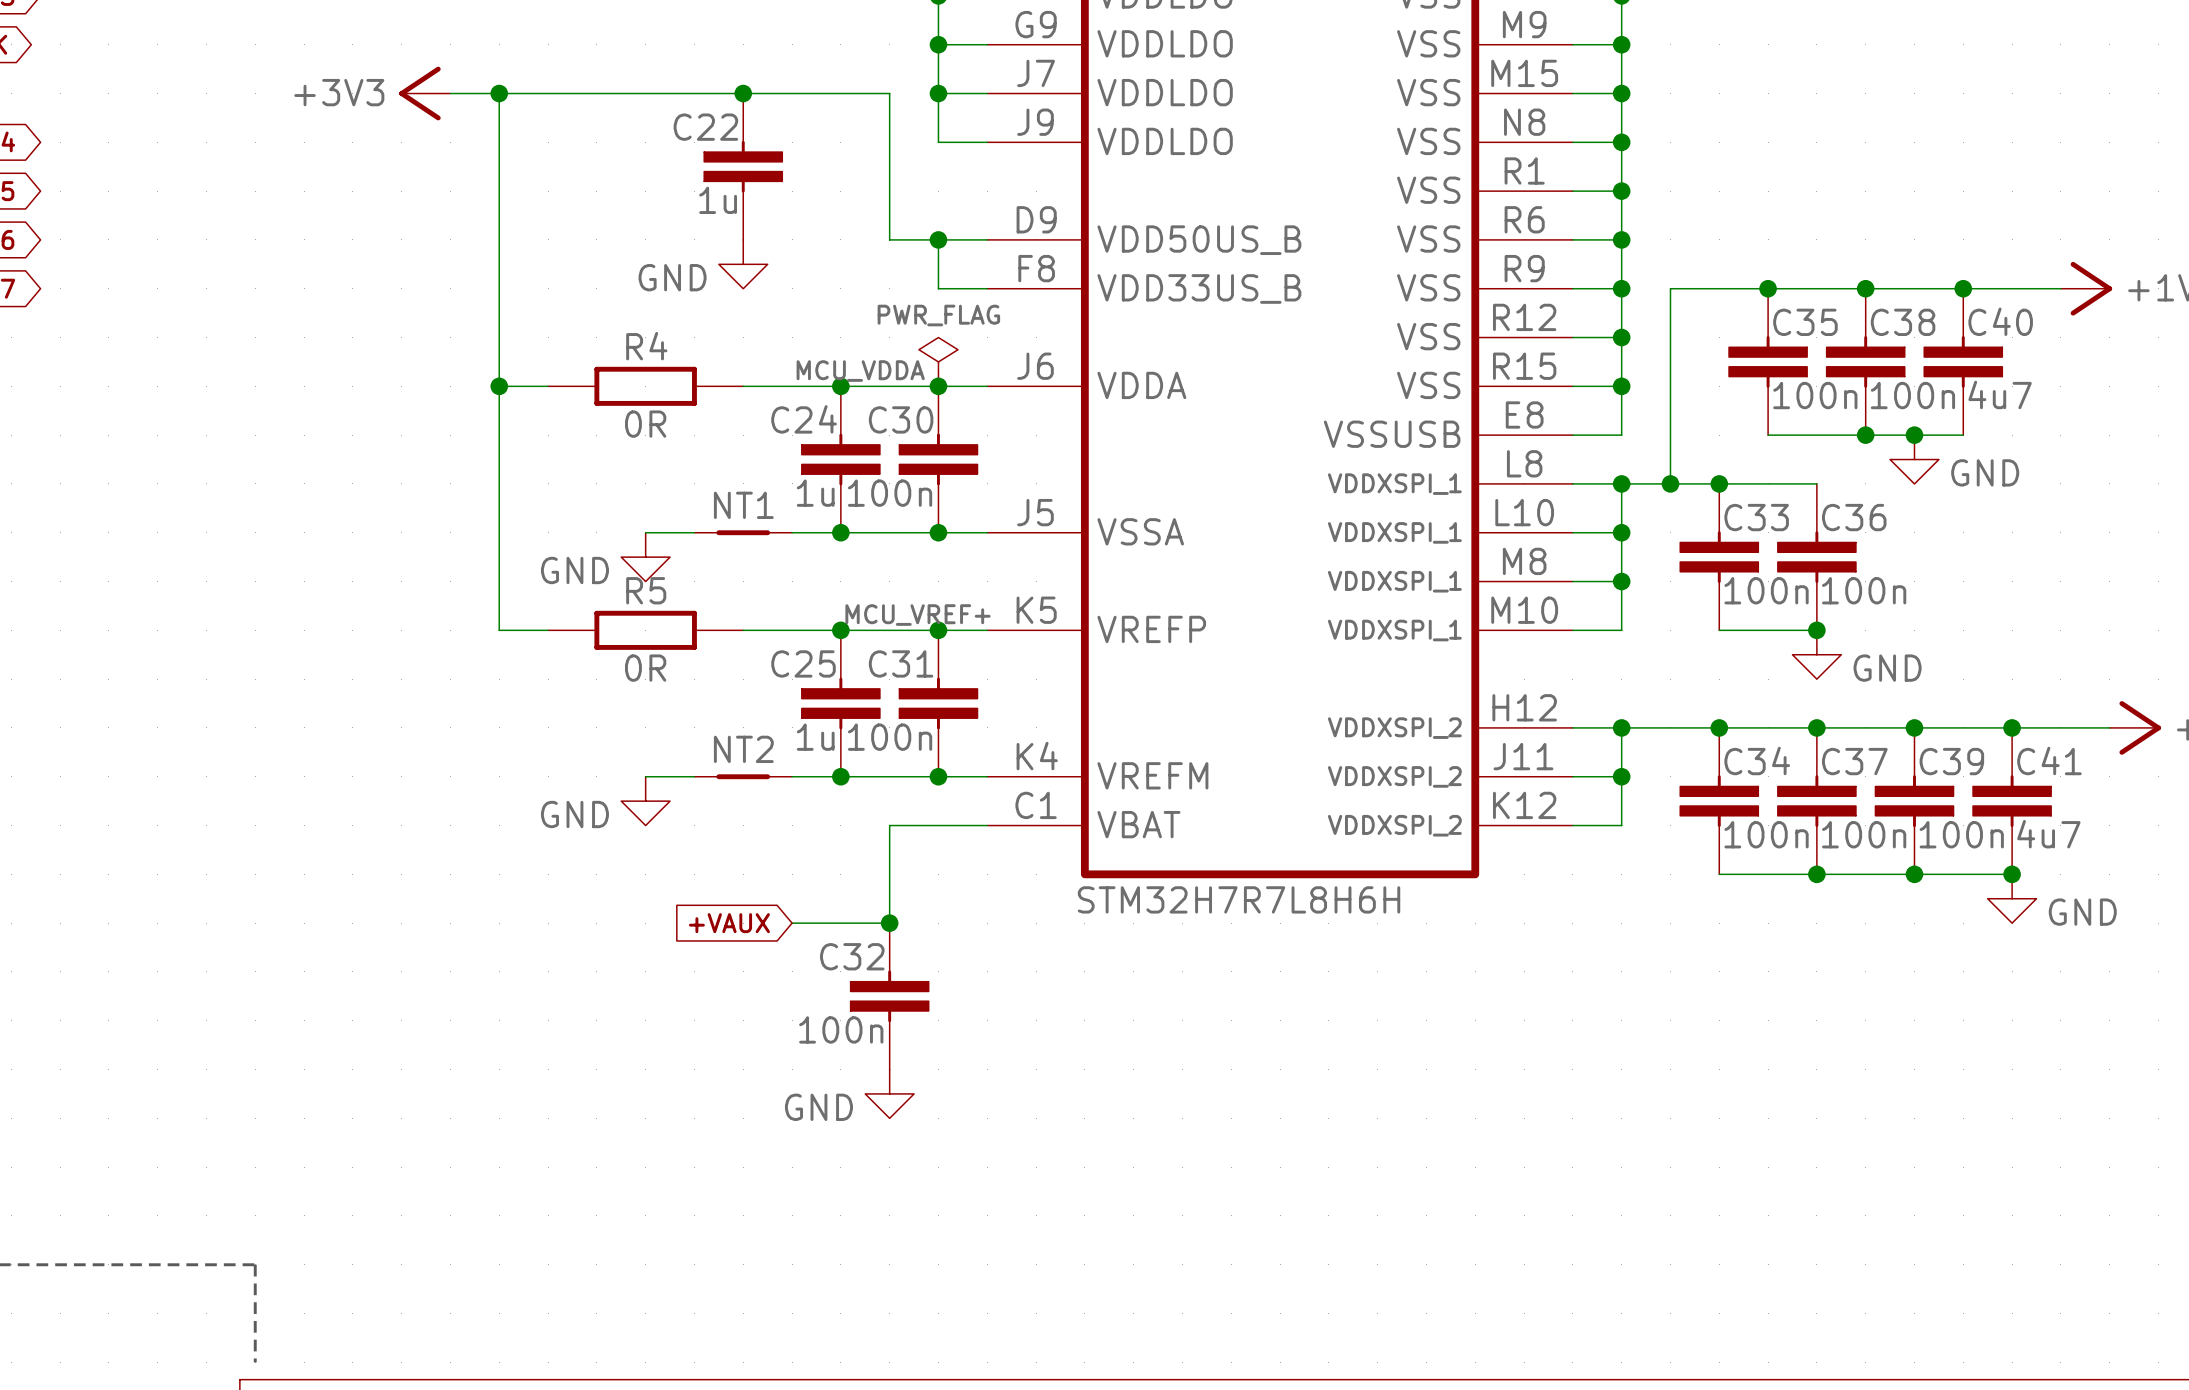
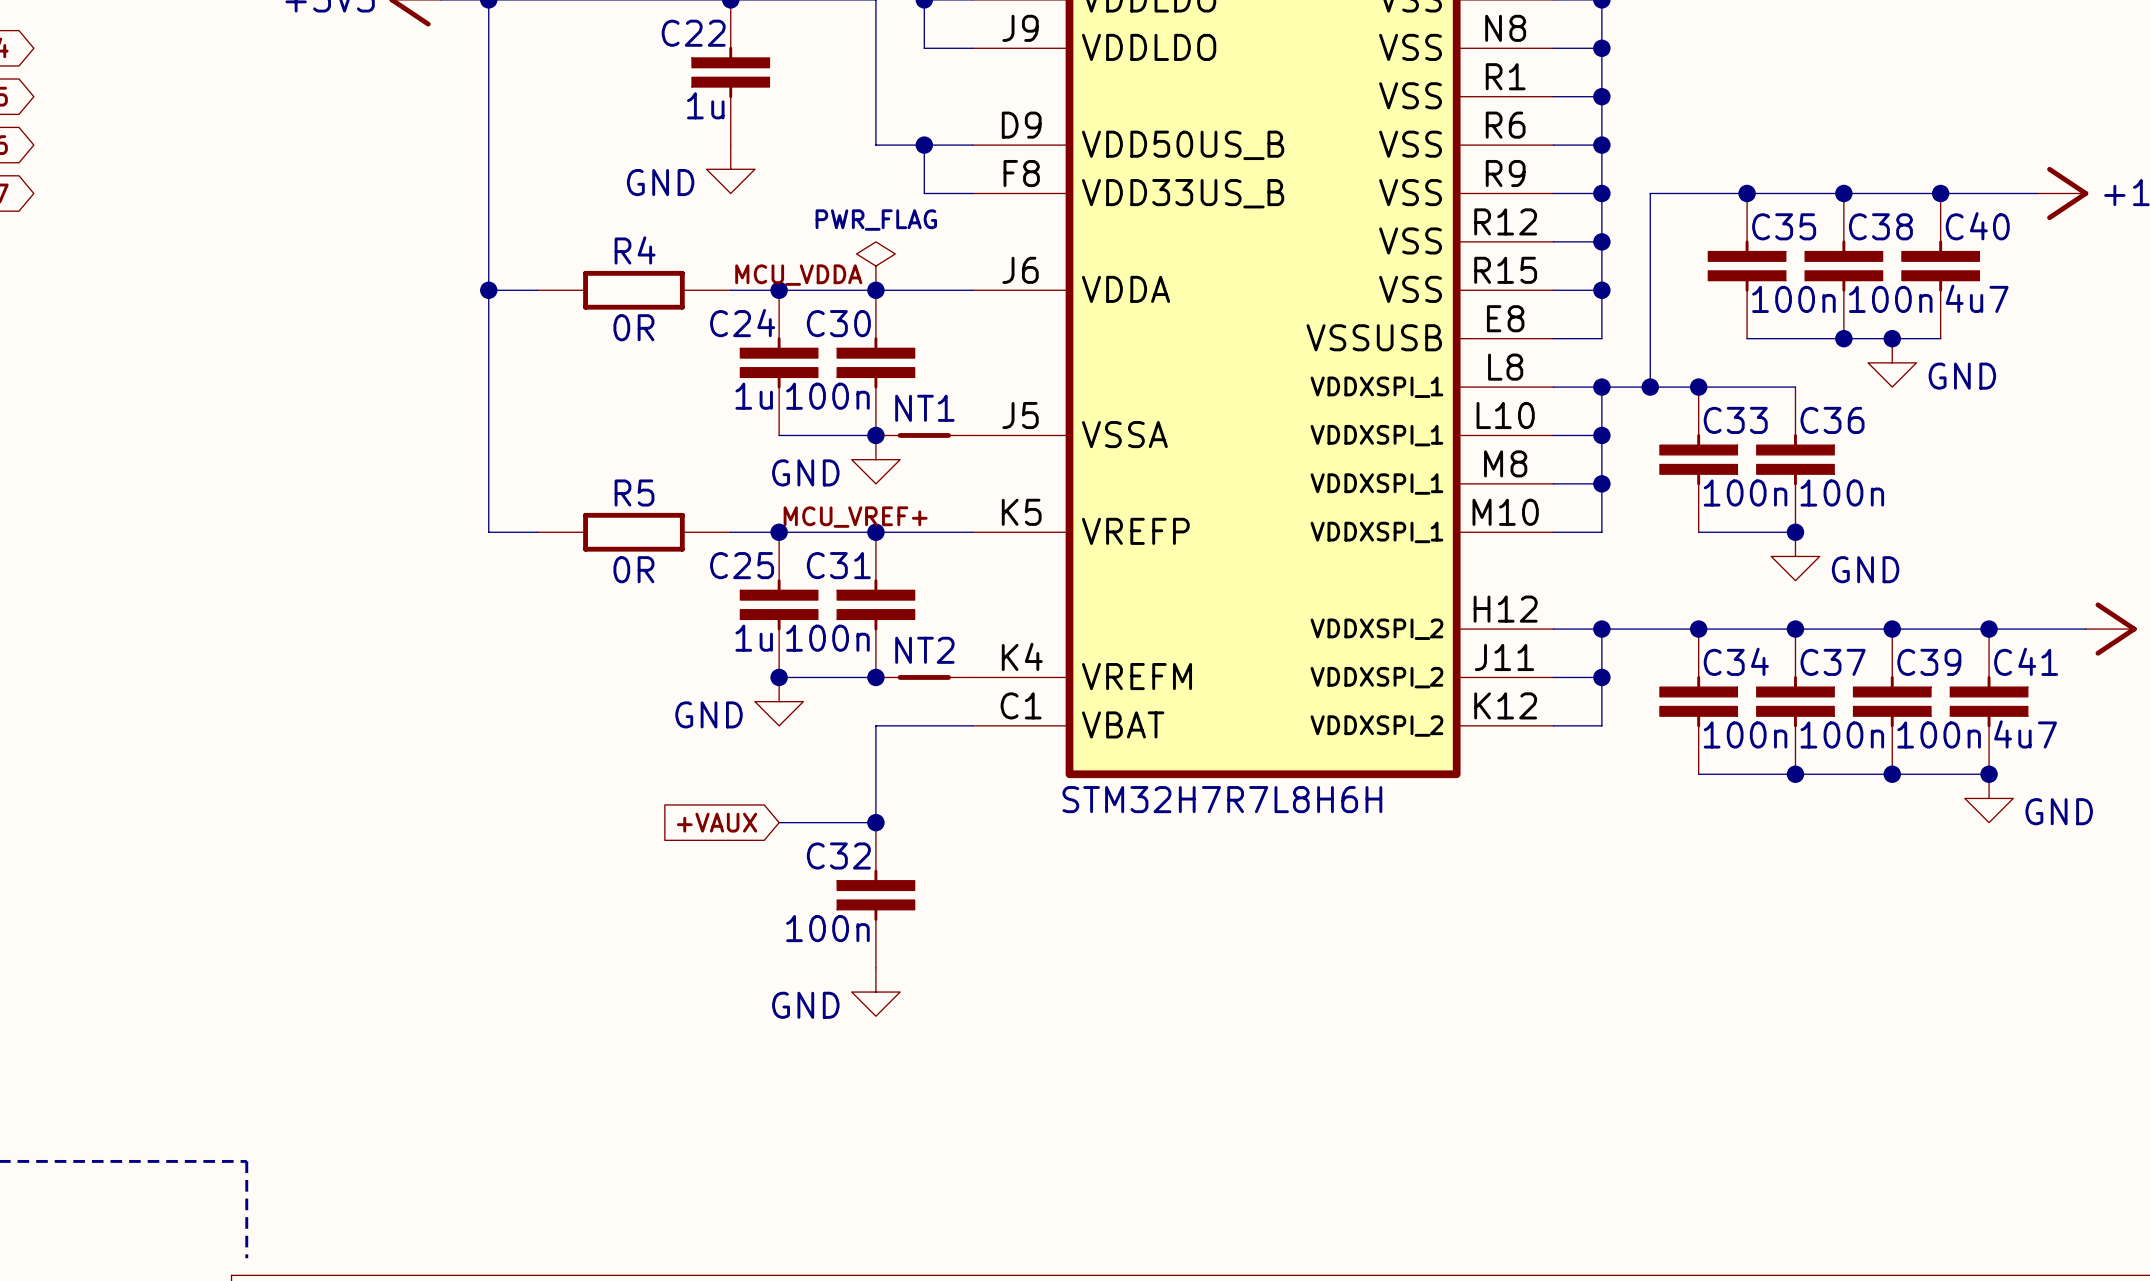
power symbol position: PWR_FLAG (938, 361) -> PWR_FLAG (875, 266)
label position: MCU_VDDA (860, 371) -> MCU_VDDA (798, 275)
junction: none -> (779, 290)
junction: (840, 386) -> none
junction: none -> (875, 290)
junction: (938, 386) -> none
C24 position: (840, 459) -> (779, 362)
C30 position: (938, 459) -> (875, 362)
wire: (645, 532) (694, 532) -> none
NT1 position: (743, 532) -> (924, 435)
junction: (840, 532) -> none
junction: none -> (875, 435)
junction: (938, 532) -> none
power symbol: GND (645, 557) -> none
power symbol: none -> GND (875, 459)
label position: MCU_VREF+ (918, 615) -> MCU_VREF+ (855, 517)
junction: none -> (779, 532)
junction: (840, 630) -> none
junction: none -> (875, 532)
junction: (938, 630) -> none
C25 position: (840, 703) -> (779, 604)
C31 position: (938, 703) -> (875, 604)
wire: (645, 776) (694, 776) -> none
NT2 position: (743, 776) -> (924, 677)
junction: none -> (779, 677)
junction: (840, 776) -> none
junction: none -> (875, 677)
junction: (938, 776) -> none
power symbol: GND (645, 801) -> none
power symbol: none -> GND (779, 701)

